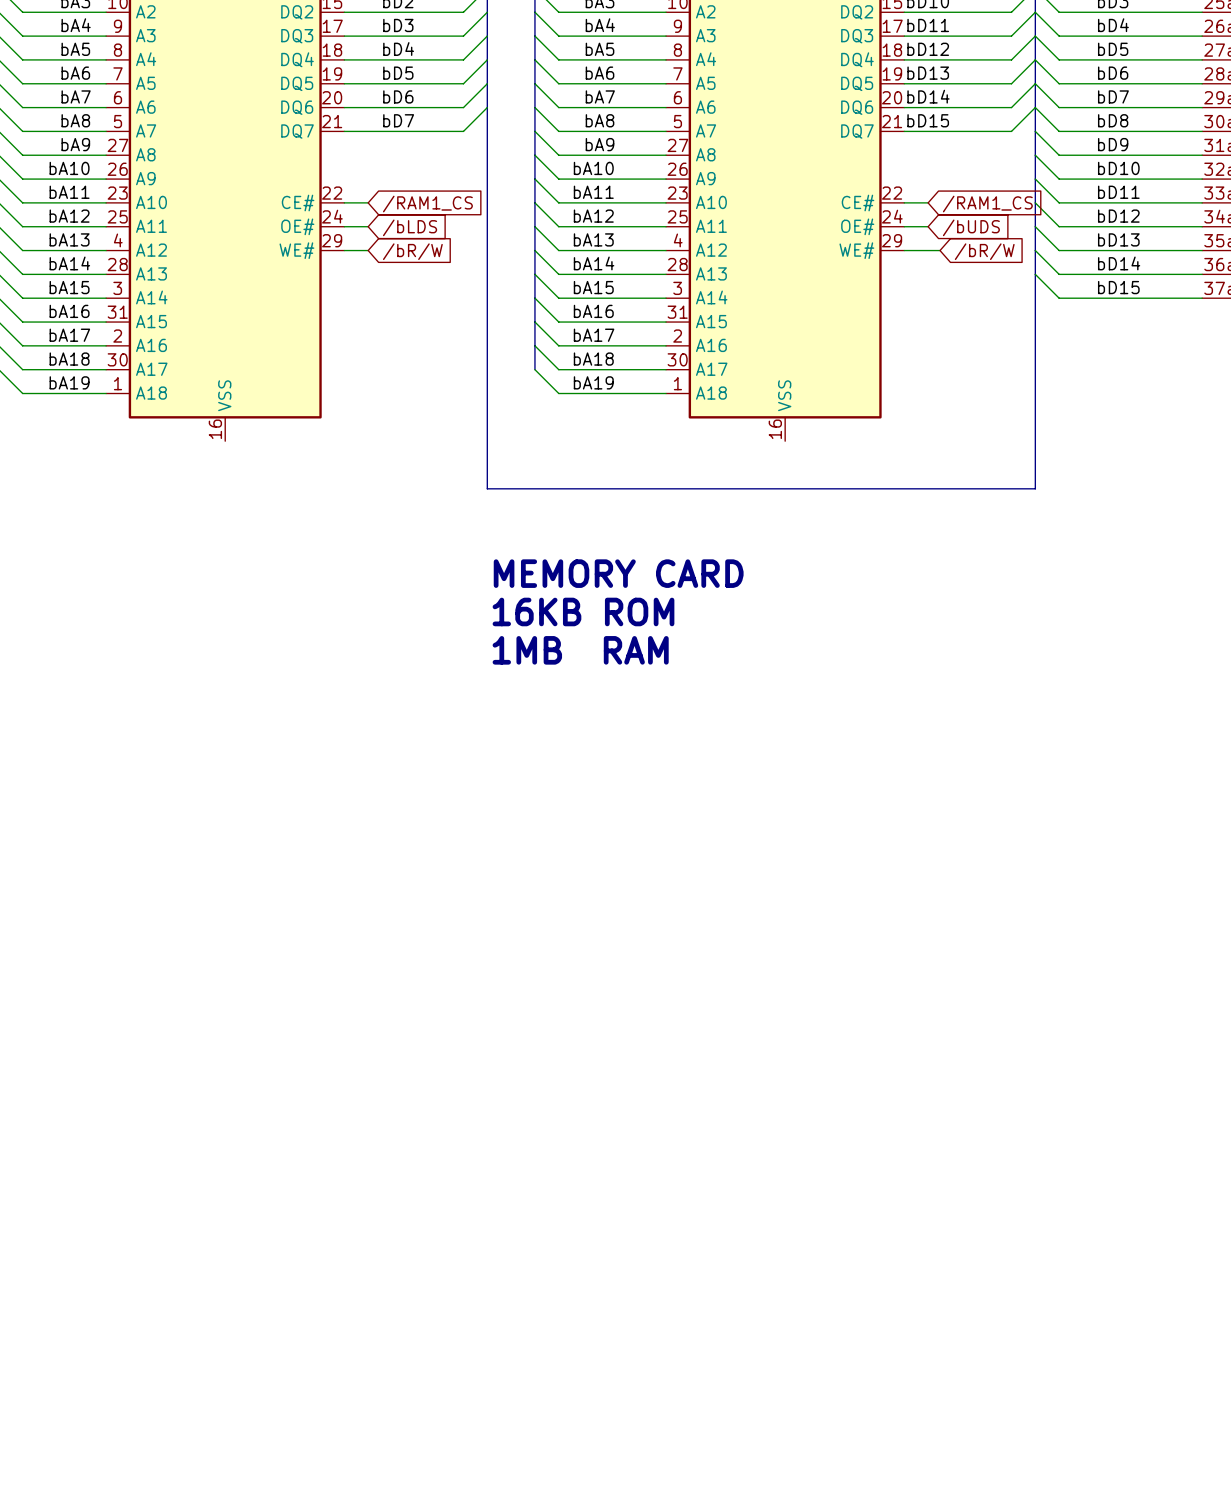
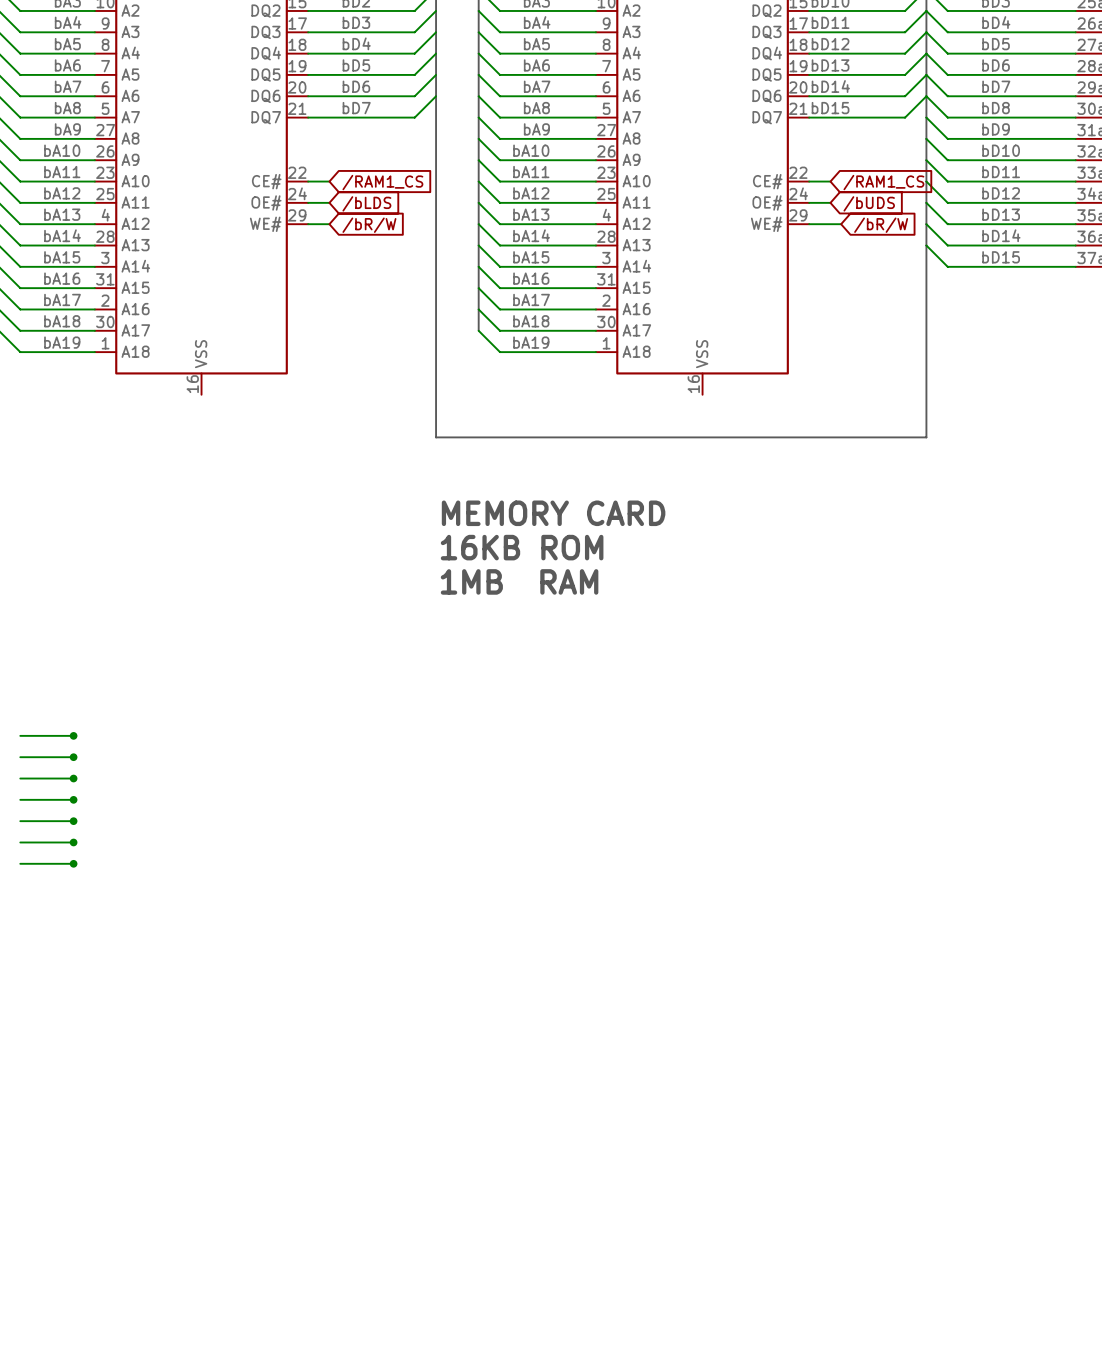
wire: none -> (20, 735) (73, 735)
junction: none -> (73, 735)
wire: none -> (20, 757) (73, 757)
junction: none -> (73, 757)
wire: none -> (20, 778) (73, 778)
junction: none -> (73, 778)
wire: none -> (20, 799) (73, 799)
junction: none -> (73, 799)
wire: none -> (20, 821) (73, 821)
junction: none -> (73, 821)
wire: none -> (20, 842) (73, 842)
junction: none -> (73, 842)
wire: none -> (20, 863) (73, 863)
junction: none -> (73, 863)

